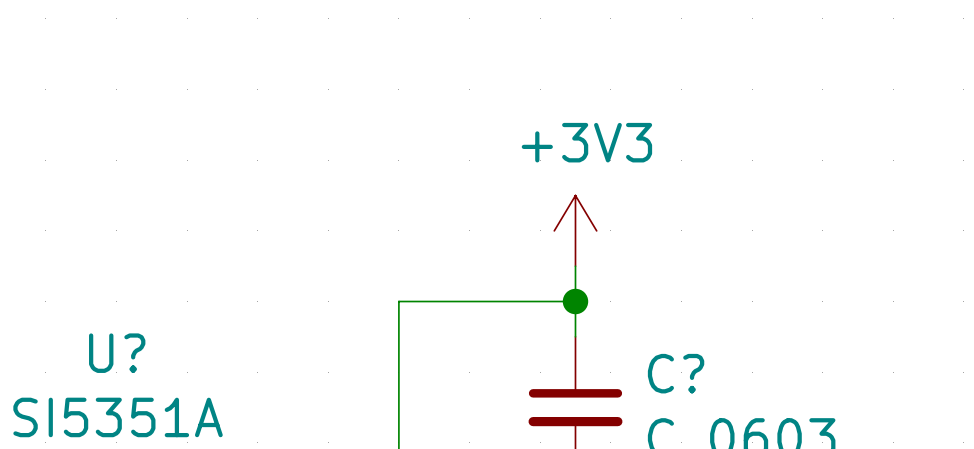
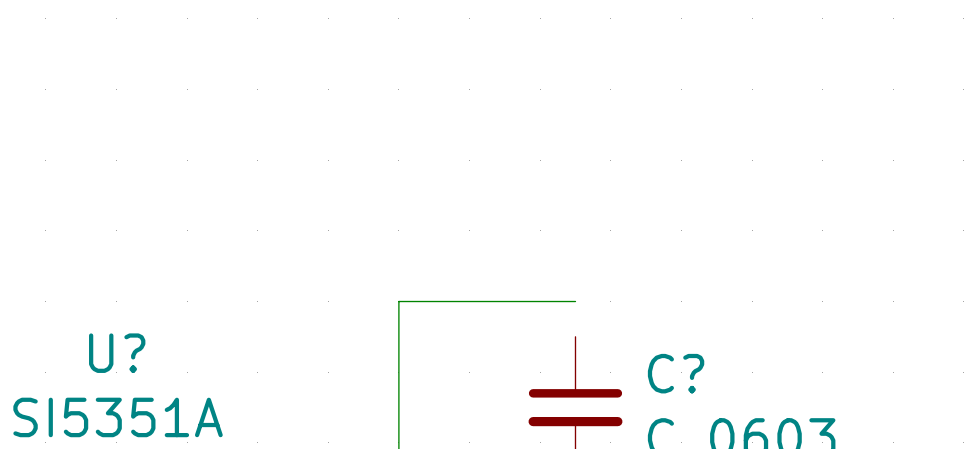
power symbol: +3V3 (575, 230) -> none
wire: (575, 266) (575, 336) -> none
junction: (575, 301) -> none

